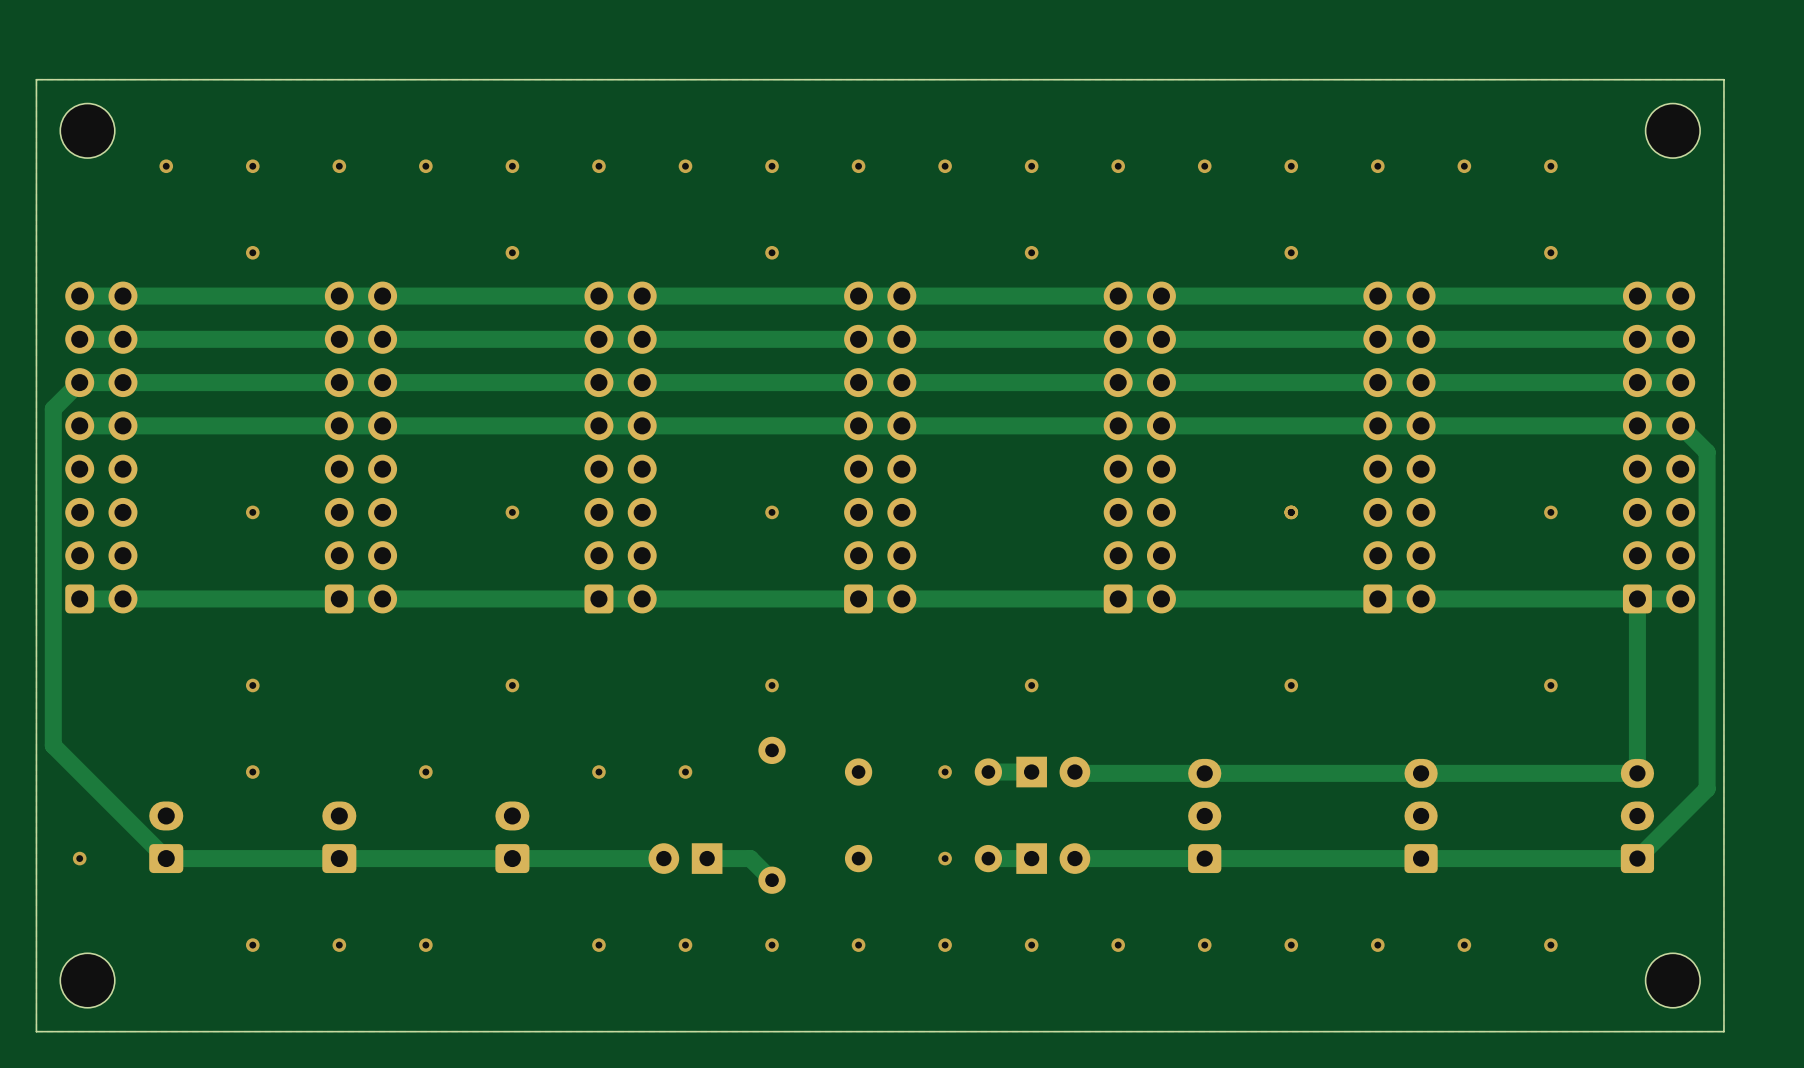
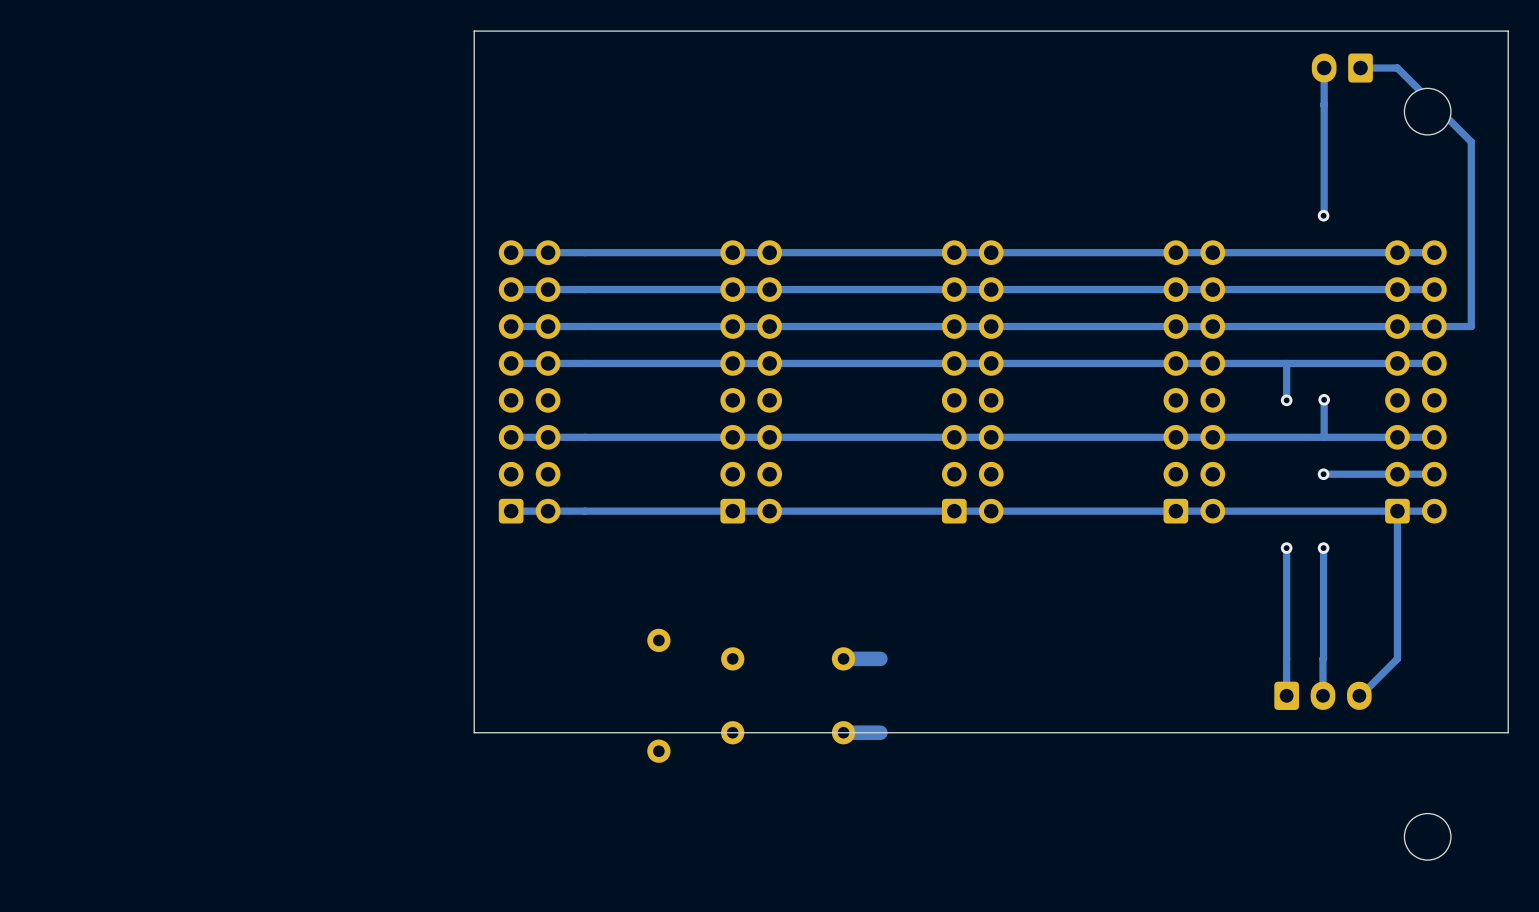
track: none -> (1324, 68) (1323, 104)
part: none -> (1342, 68)
track: none -> (1360, 68) (1397, 68) (1471, 141) (1471, 326) (1434, 326)
board edge: (1723, 79) (36, 79) (36, 1031) (1723, 1031) (1723, 79) -> (1508, 31) (1508, 732) (474, 732) (474, 31) (1508, 31)
track: none -> (1324, 104) (1324, 215)
part: (87, 130) -> none
via: (166, 166) -> none
via: (252, 166) -> none
via: (339, 166) -> none
via: (425, 166) -> none
via: (512, 166) -> none
via: (598, 166) -> none
via: (685, 166) -> none
via: (772, 166) -> none
via: (858, 166) -> none
via: (945, 166) -> none
via: (1031, 166) -> none
via: (1118, 166) -> none
via: (1204, 166) -> none
via: (1291, 166) -> none
via: (1377, 166) -> none
via: (1464, 166) -> none
via: (1550, 166) -> none
via: (252, 252) -> none
via: (512, 252) -> none
via: (772, 252) -> none
via: (1031, 252) -> none
via: (1291, 252) -> none
track: (598, 296) (79, 296) -> none
track width: thick (1680, 296) (598, 296) -> thin (1434, 252) (511, 252)
track: (598, 339) (79, 339) -> none
track width: thick (1680, 339) (598, 339) -> thin (1434, 289) (511, 289)
track: (598, 382) (79, 382) (53, 409) (53, 745) (166, 858) (663, 858) -> none
track width: thick (1680, 382) (598, 382) -> thin (1434, 326) (511, 326)
track: (598, 425) (79, 425) -> none
track: none -> (1286, 363) (1286, 400)
track: (1680, 425) (1707, 452) (1707, 788) (1637, 858) (1074, 858) -> none
track width: thick (1680, 425) (598, 425) -> thin (1434, 363) (511, 363)
part: (101, 447) -> none
part: (360, 447) -> none
track: none -> (1324, 399) (1323, 437)
via: none -> (1324, 399)
via: none -> (1286, 400)
via: (252, 512) -> none
via: (512, 512) -> none
via: (772, 512) -> none
via: (1291, 512) -> none
via: (1550, 512) -> none
track: none -> (1434, 437) (511, 437)
via: none -> (1323, 474)
track: none -> (1434, 474) (1323, 474)
track: (598, 598) (79, 598) -> none
track width: thick (1637, 598) (1637, 772) -> thin (1397, 511) (1397, 658)
track width: thick (1680, 598) (598, 598) -> thin (1434, 511) (511, 511)
track: none -> (1286, 548) (1286, 695)
via: none -> (1286, 548)
track: none -> (1323, 548) (1323, 695)
via: none -> (1323, 548)
via: (252, 685) -> none
via: (512, 685) -> none
via: (772, 685) -> none
via: (1031, 685) -> none
via: (1291, 685) -> none
via: (1550, 685) -> none
via: (252, 772) -> none
via: (425, 772) -> none
via: (598, 772) -> none
via: (685, 772) -> none
via: (945, 772) -> none
part: (1053, 772) -> none
track: (1637, 772) (1074, 772) -> (1397, 658) (1359, 695)
part: (1204, 815) -> none
part: (1421, 815) -> none
part: none -> (1323, 695)
part: (1637, 815) -> none
part: (166, 837) -> none
part: (339, 837) -> none
part: (512, 837) -> none
via: (79, 858) -> none
part: (685, 858) -> none
track: (707, 858) (750, 858) (772, 880) -> none
via: (945, 858) -> none
part: (1053, 858) -> none
via: (252, 945) -> none
via: (339, 945) -> none
via: (425, 945) -> none
via: (598, 945) -> none
via: (685, 945) -> none
via: (772, 945) -> none
via: (858, 945) -> none
via: (945, 945) -> none
via: (1031, 945) -> none
via: (1118, 945) -> none
via: (1204, 945) -> none
via: (1291, 945) -> none
via: (1377, 945) -> none
via: (1464, 945) -> none
via: (1550, 945) -> none
part: (87, 980) -> none

